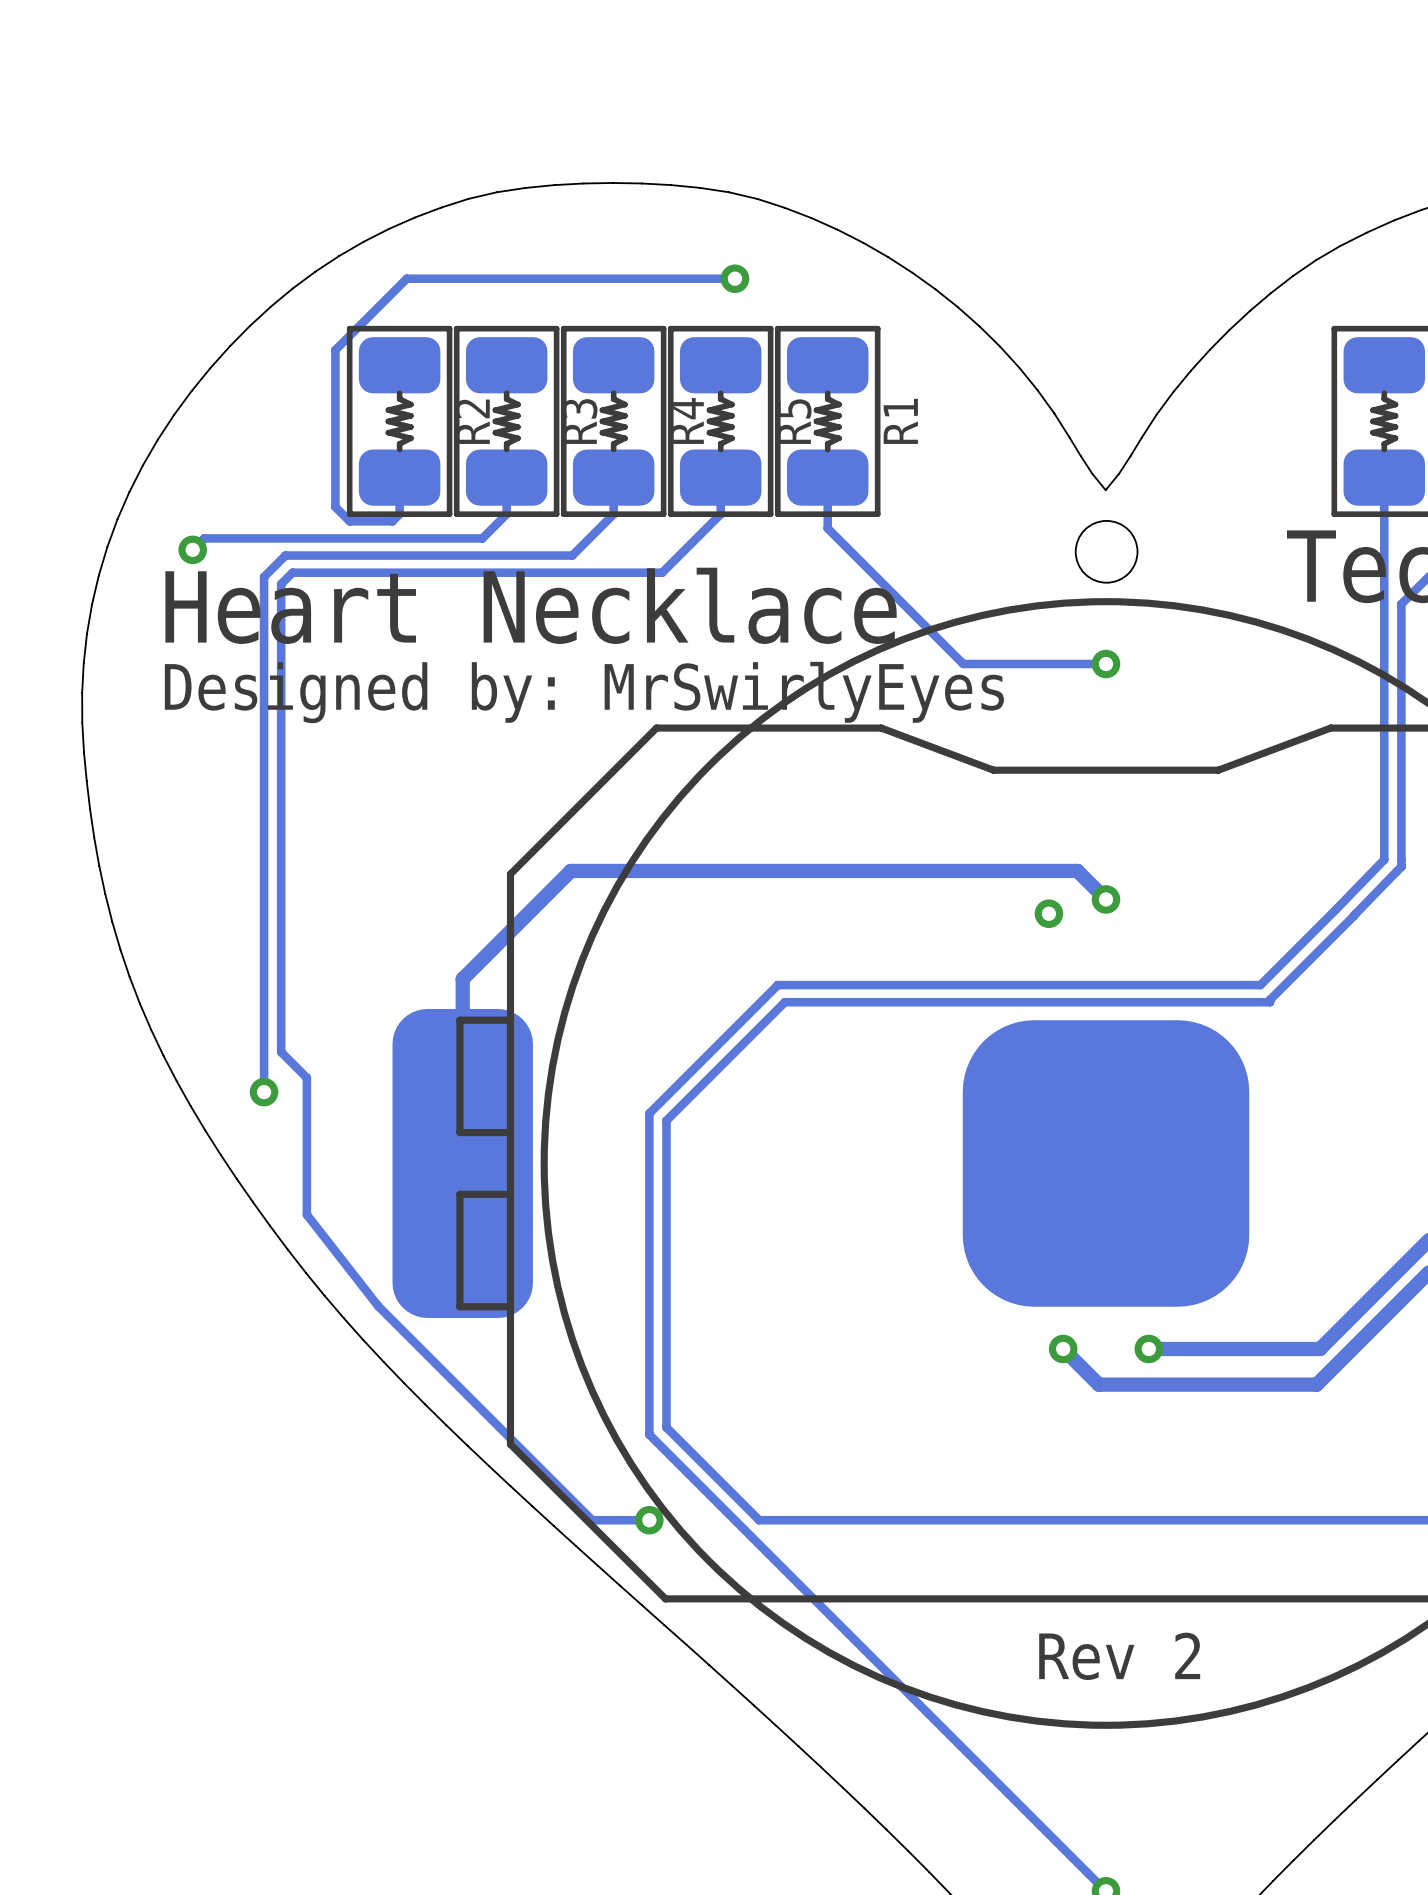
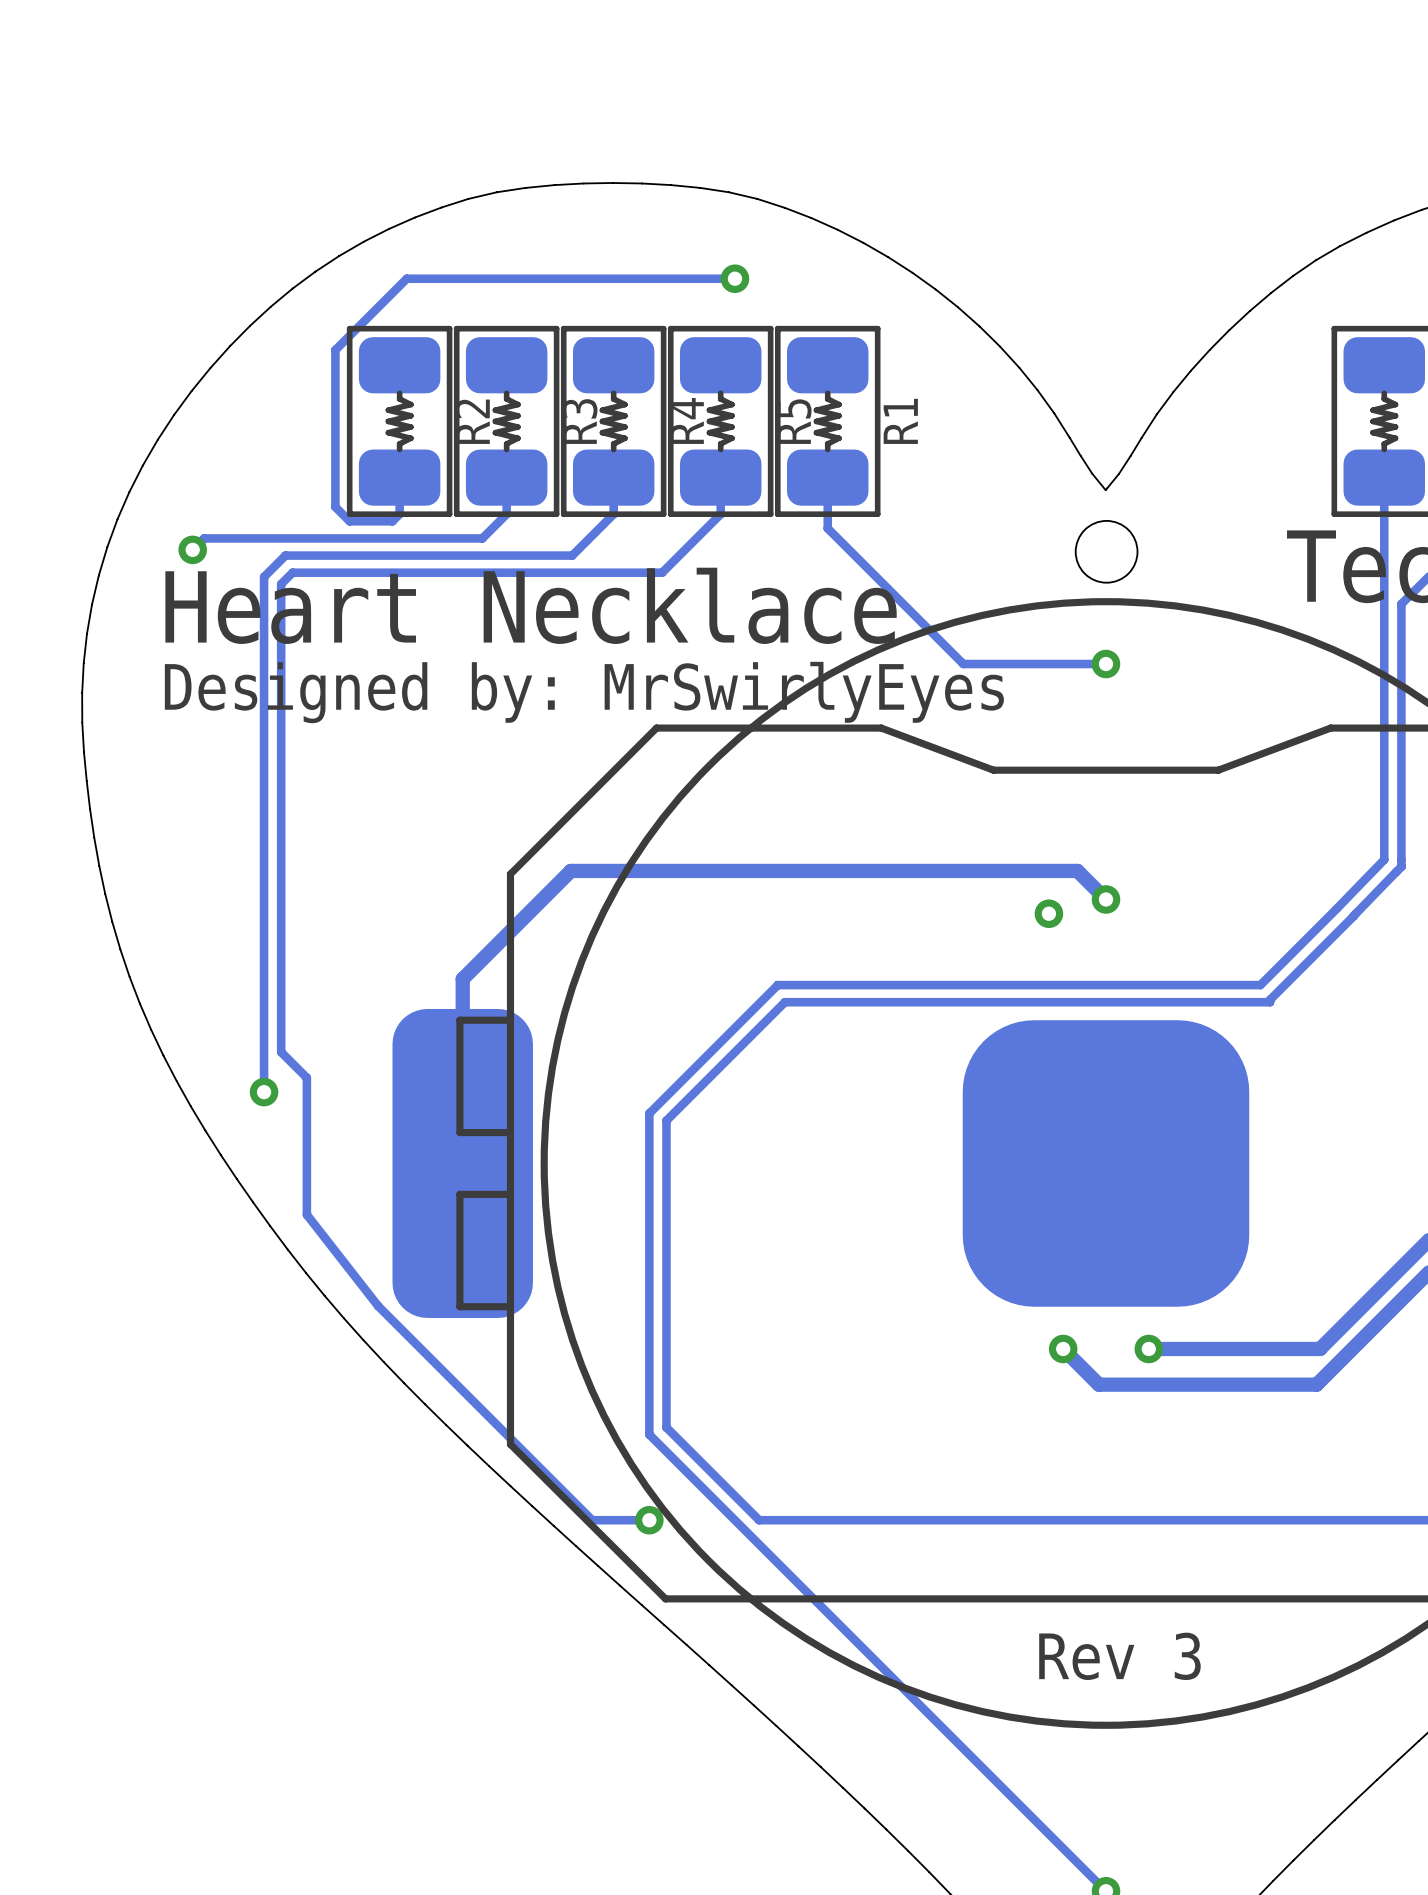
text: Rev 2 (1119, 1656) -> Rev 3 (1119, 1656)

